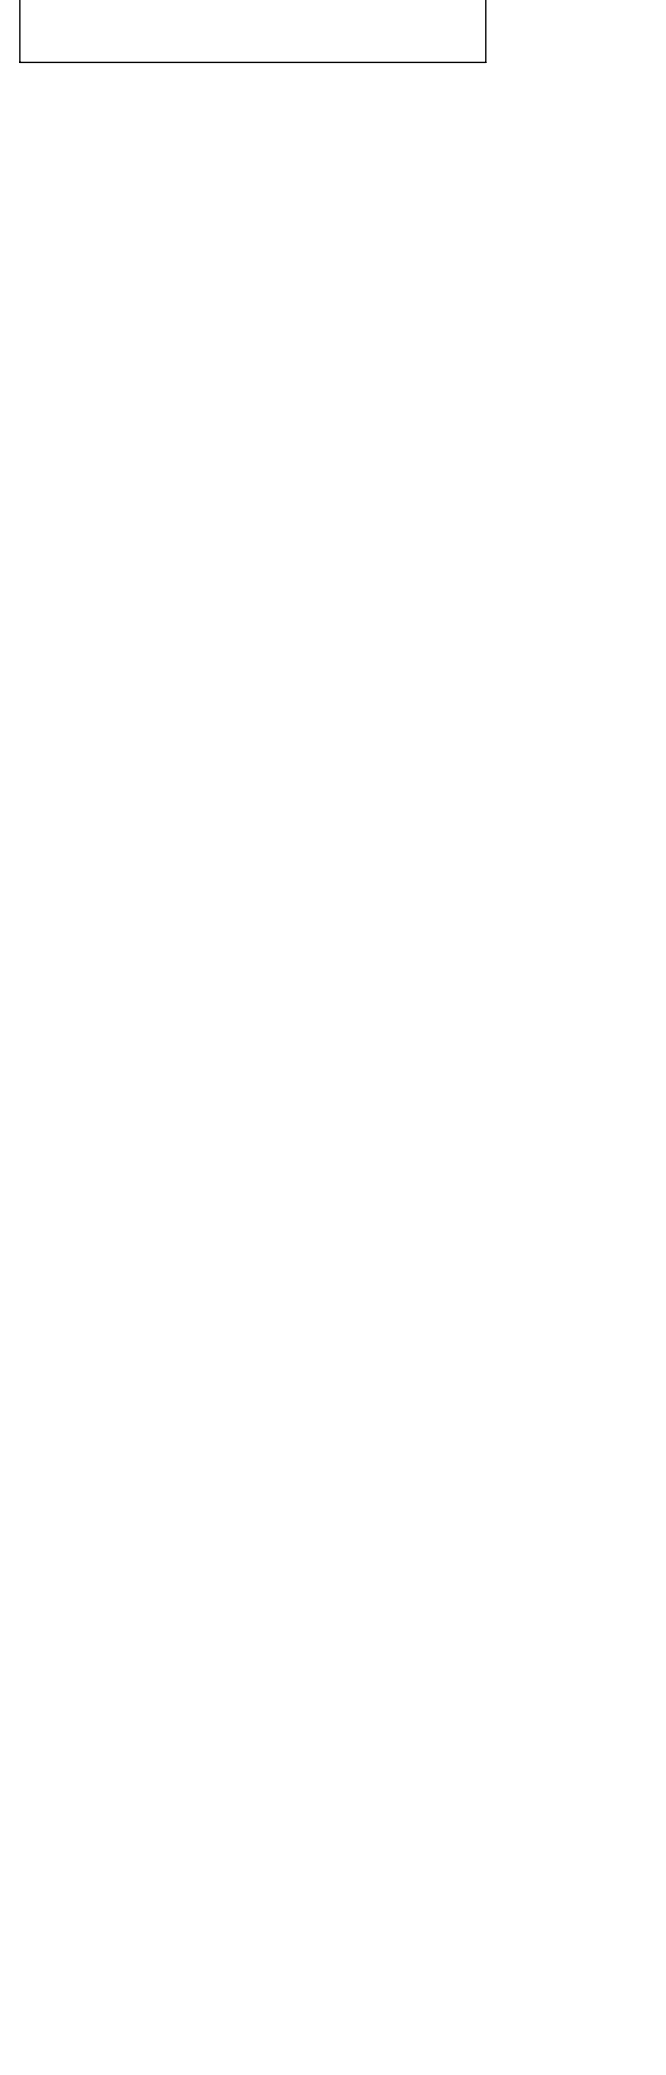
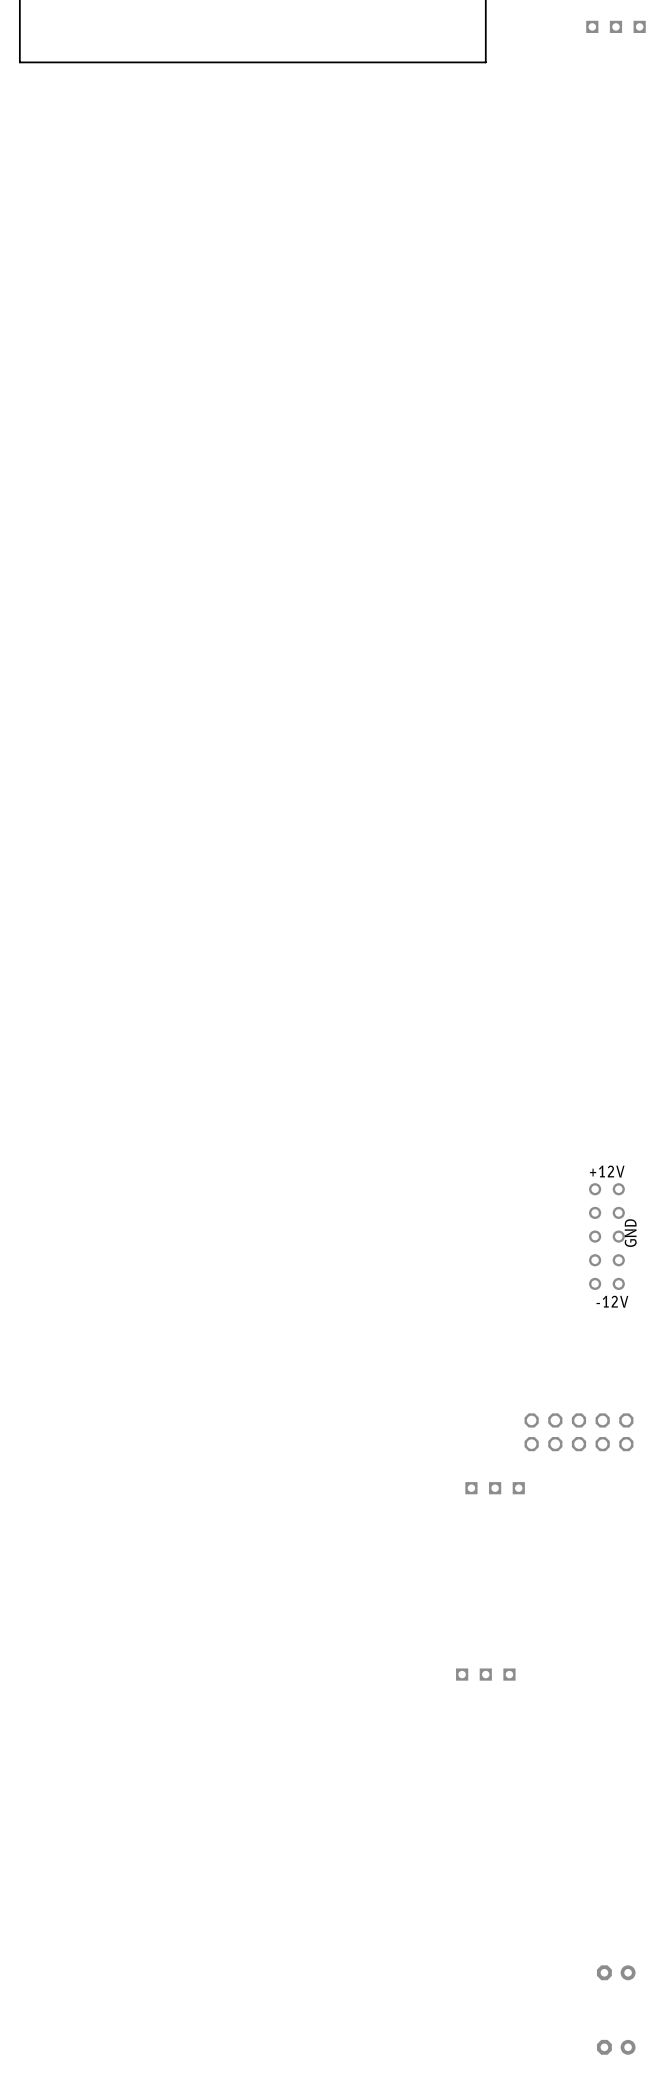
part: none -> (615, 26)
part: none -> (606, 1236)
part: none -> (578, 1432)
part: none -> (495, 1488)
part: none -> (485, 1674)
part: none -> (616, 1972)
part: none -> (616, 2047)

